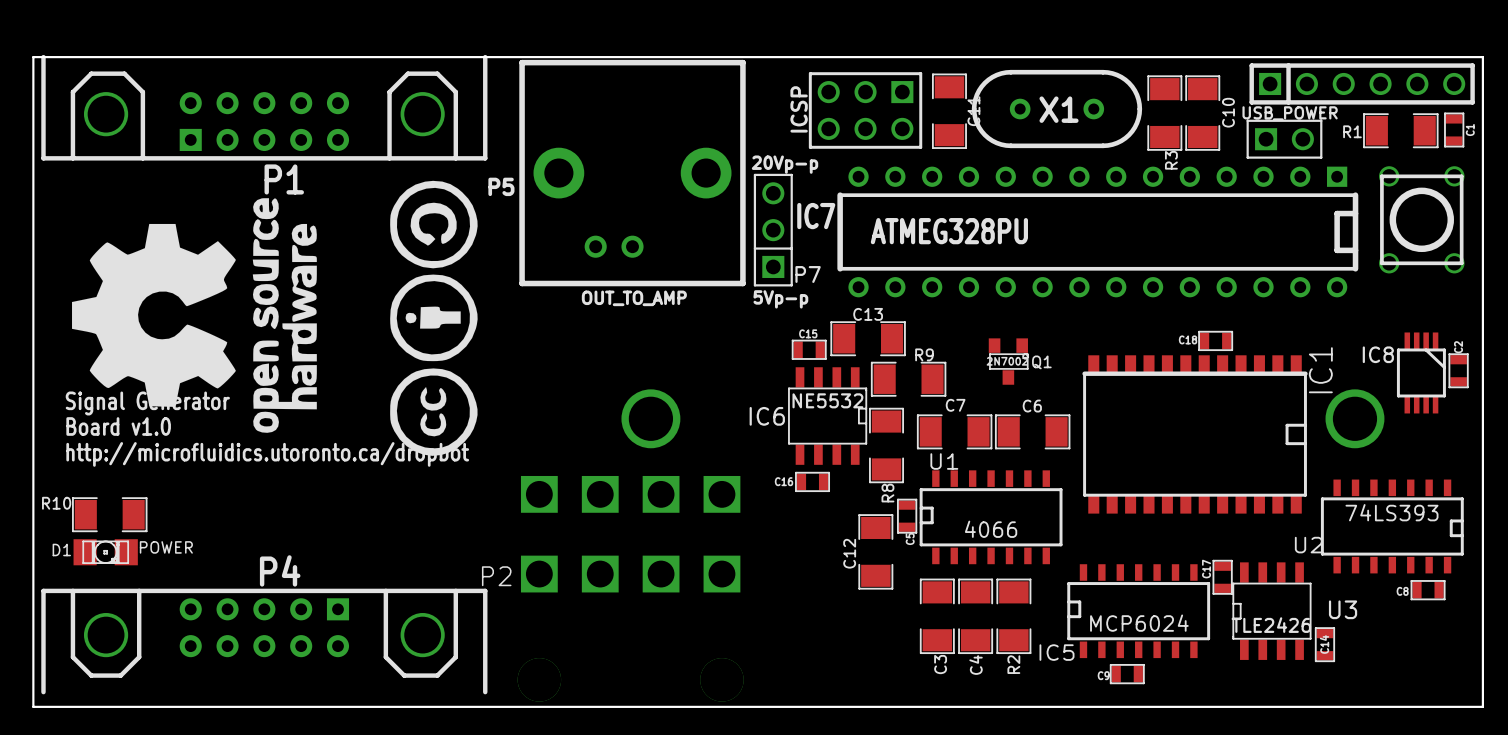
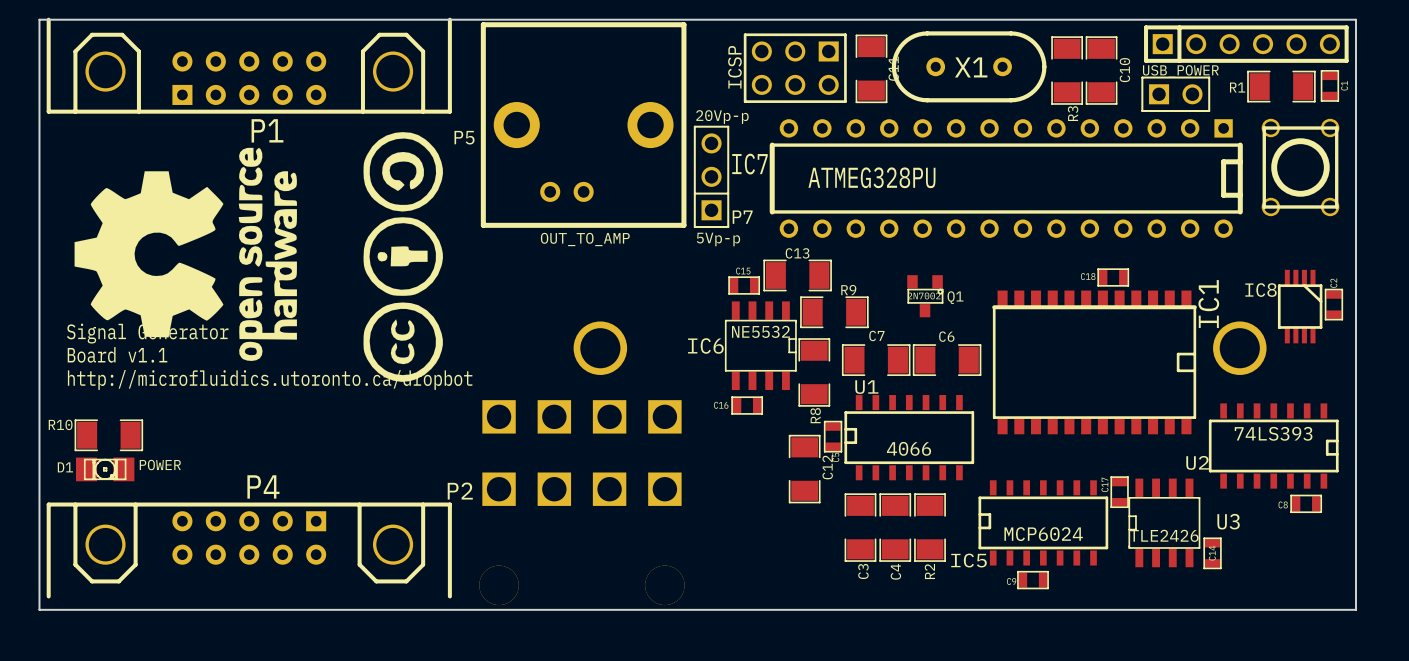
text: Board v1.0 (118, 426) -> Board v1.1 (117, 354)
C12 name position: C12 (849, 553) -> C12 (827, 467)

